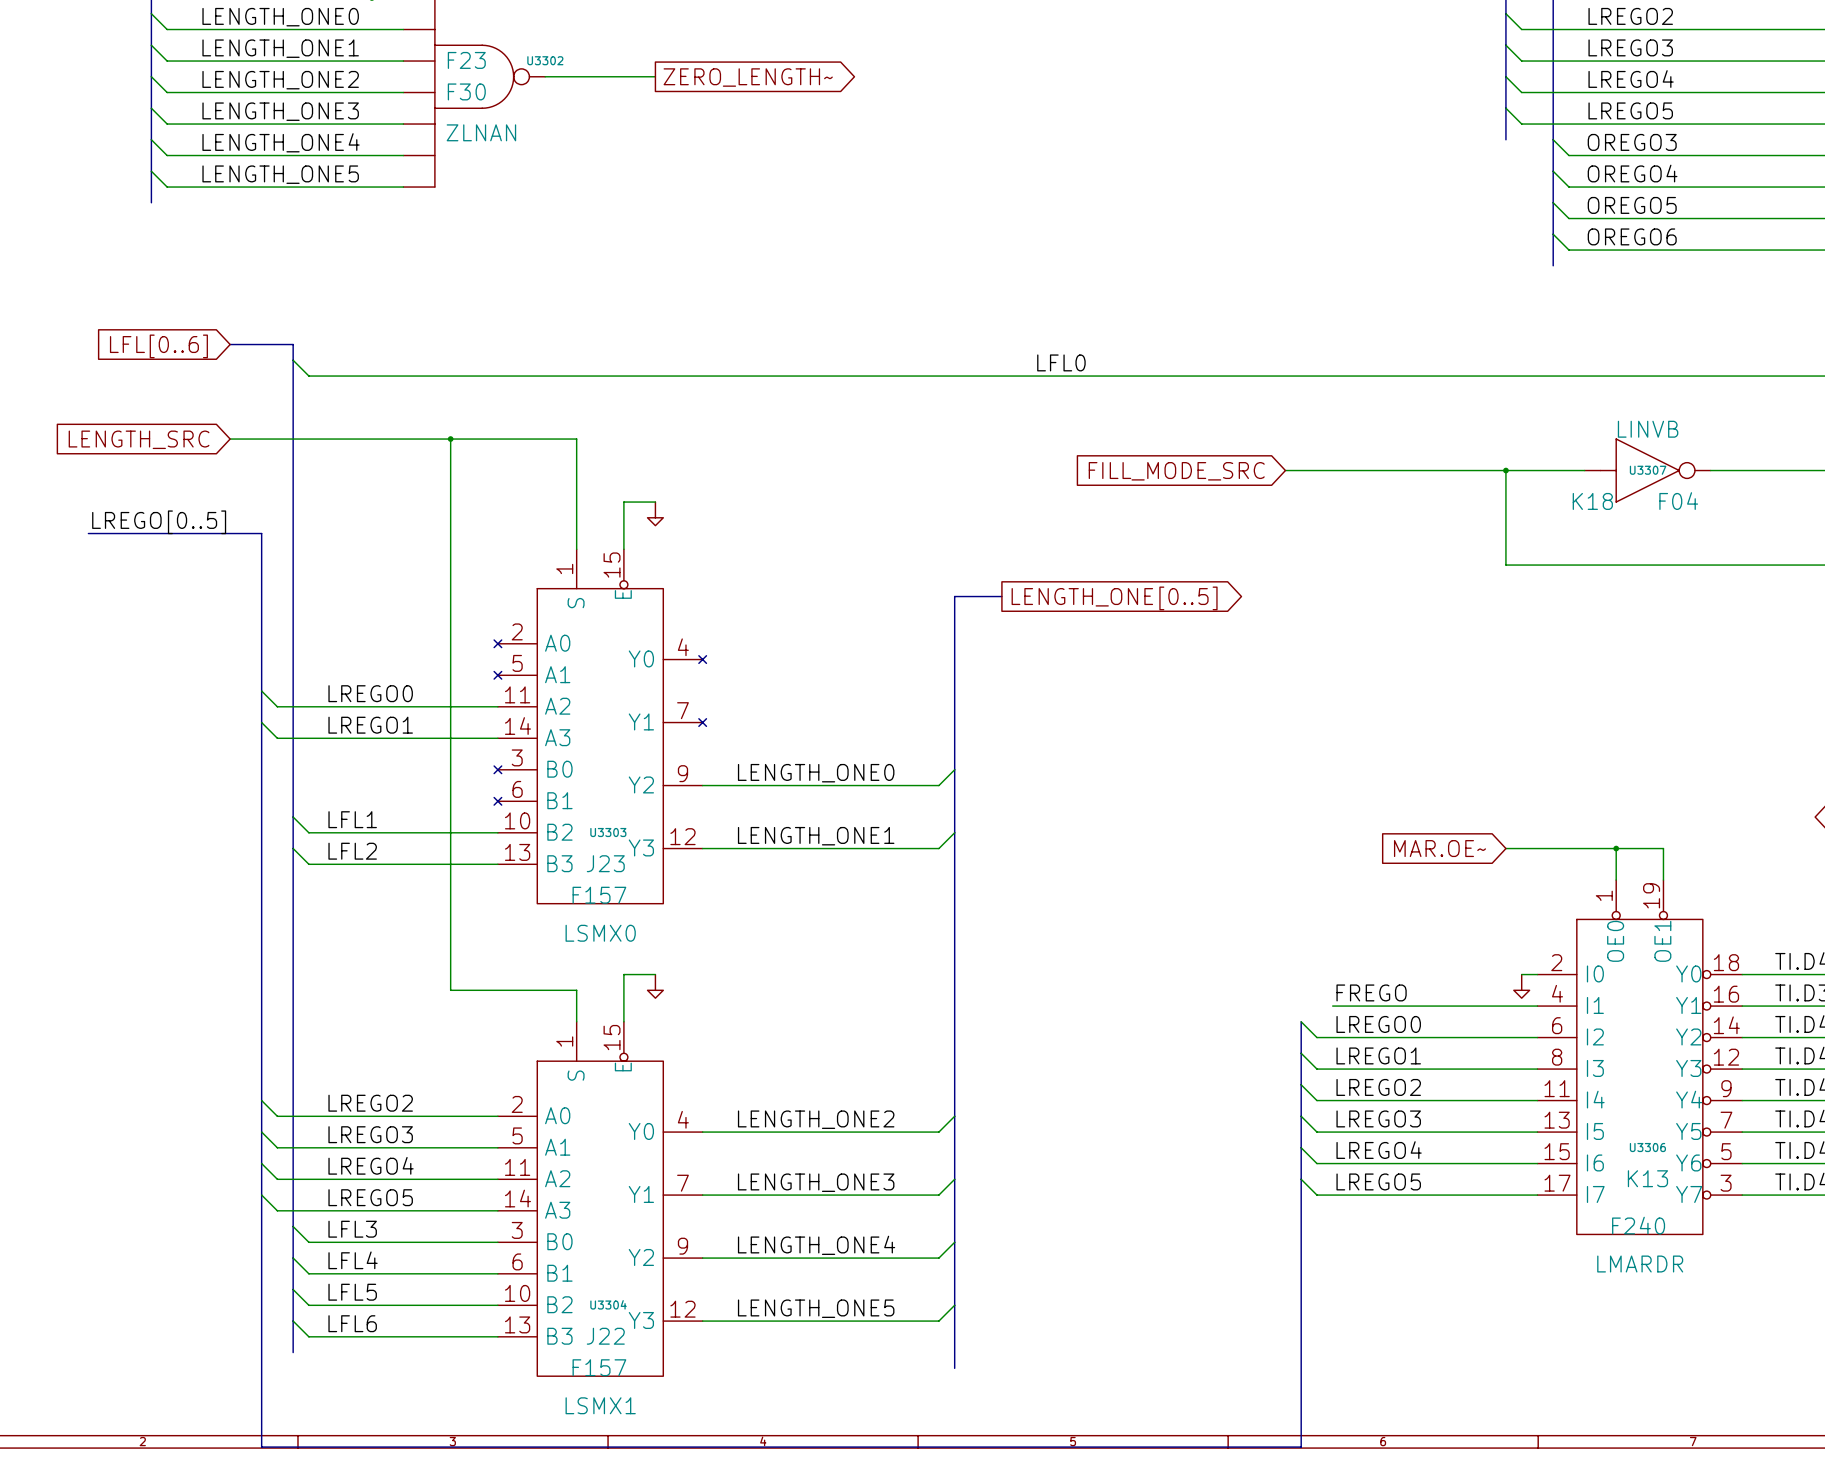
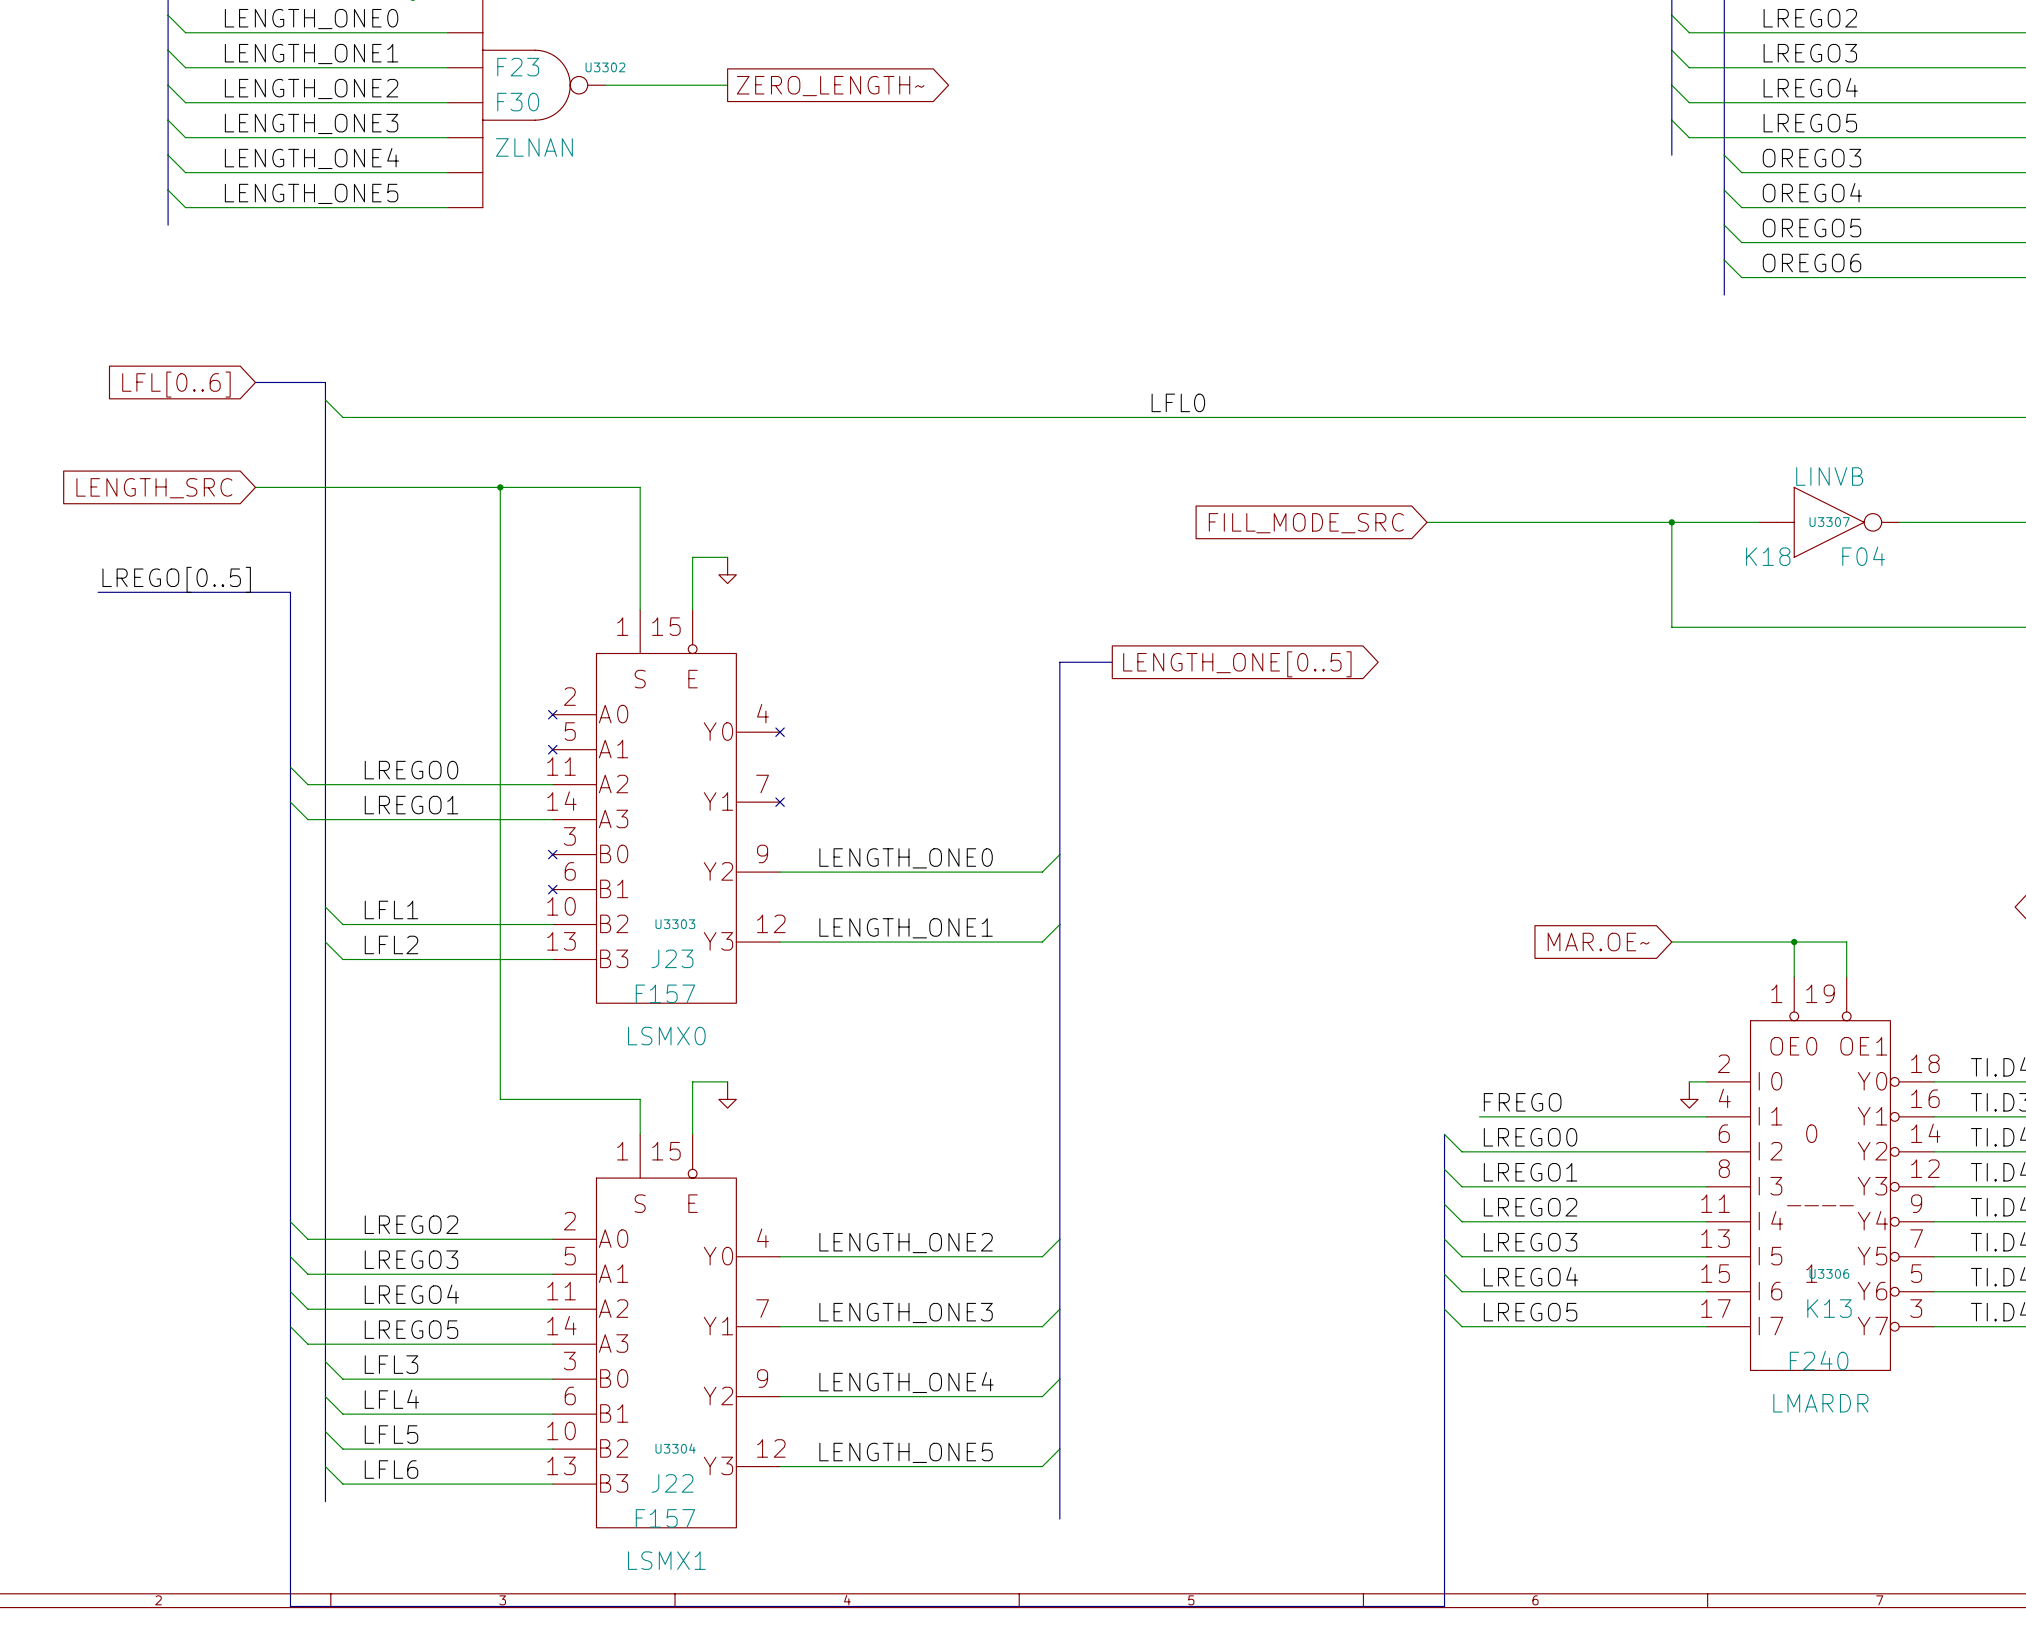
U3303 symbol: [497, 549, 703, 904] -> [552, 609, 781, 1004]
U3306 symbol: [1537, 880, 1743, 1235] -> [1706, 976, 1935, 1371]
U3304 symbol: [497, 1021, 703, 1377] -> [552, 1134, 781, 1528]

